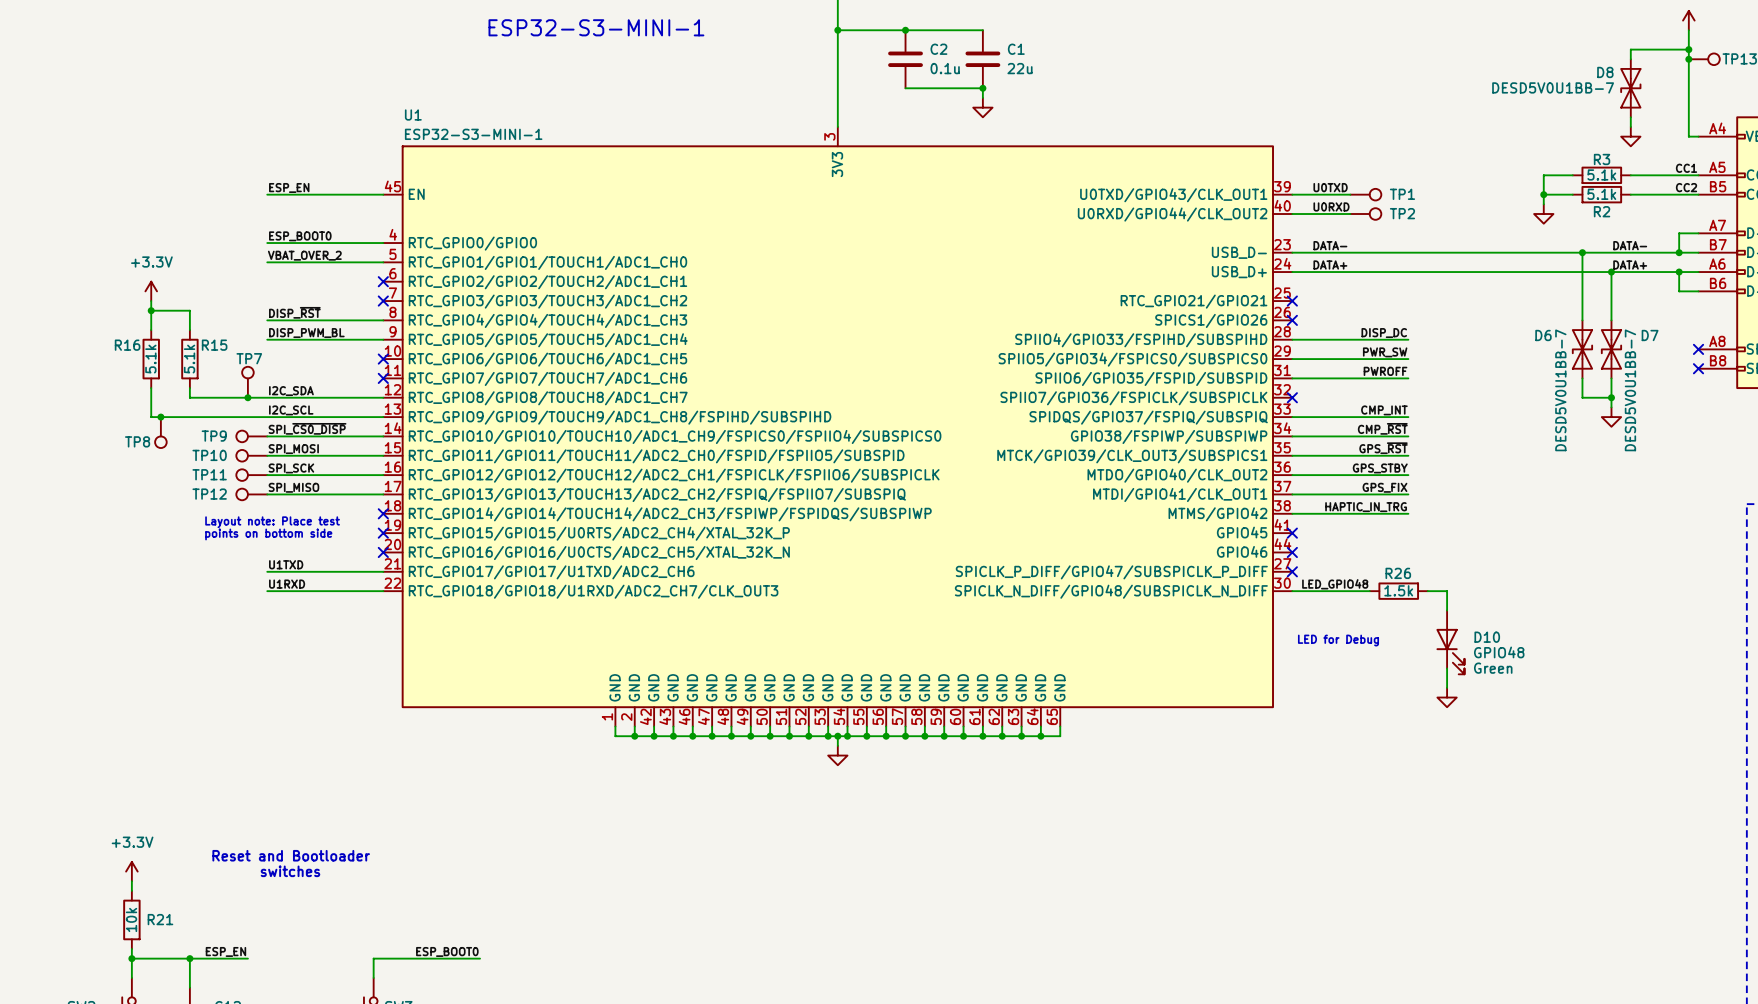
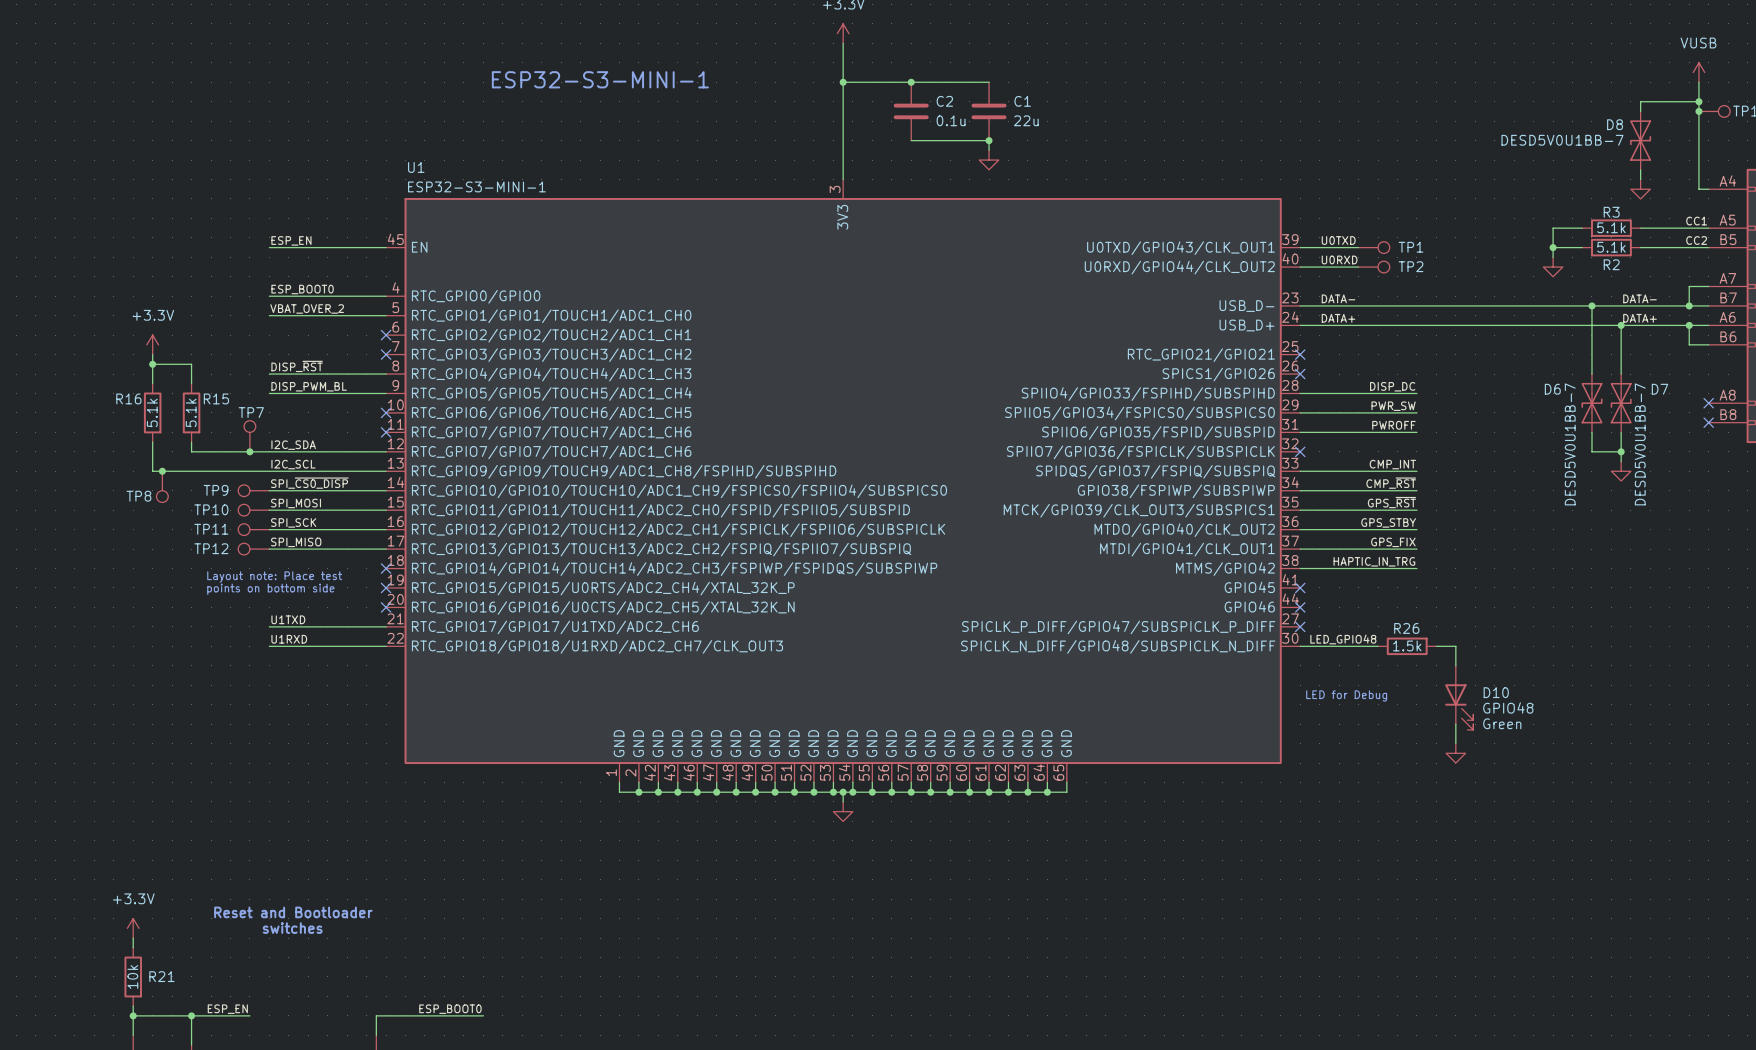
U1 pin name: RTC_GPIO8/GPIO8/TOUCH8/ADC1_CH7 (548, 398) -> RTC_GPIO7/GPIO7/TOUCH7/ADC1_CH6 (551, 452)

